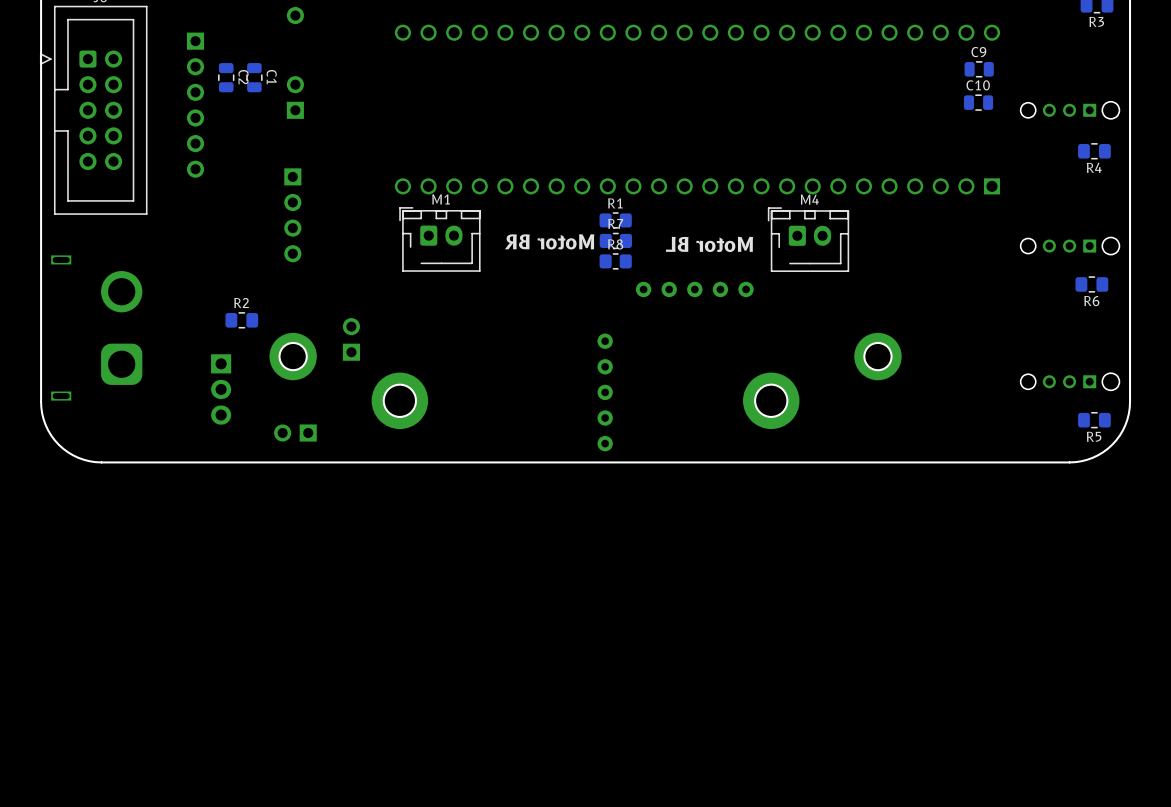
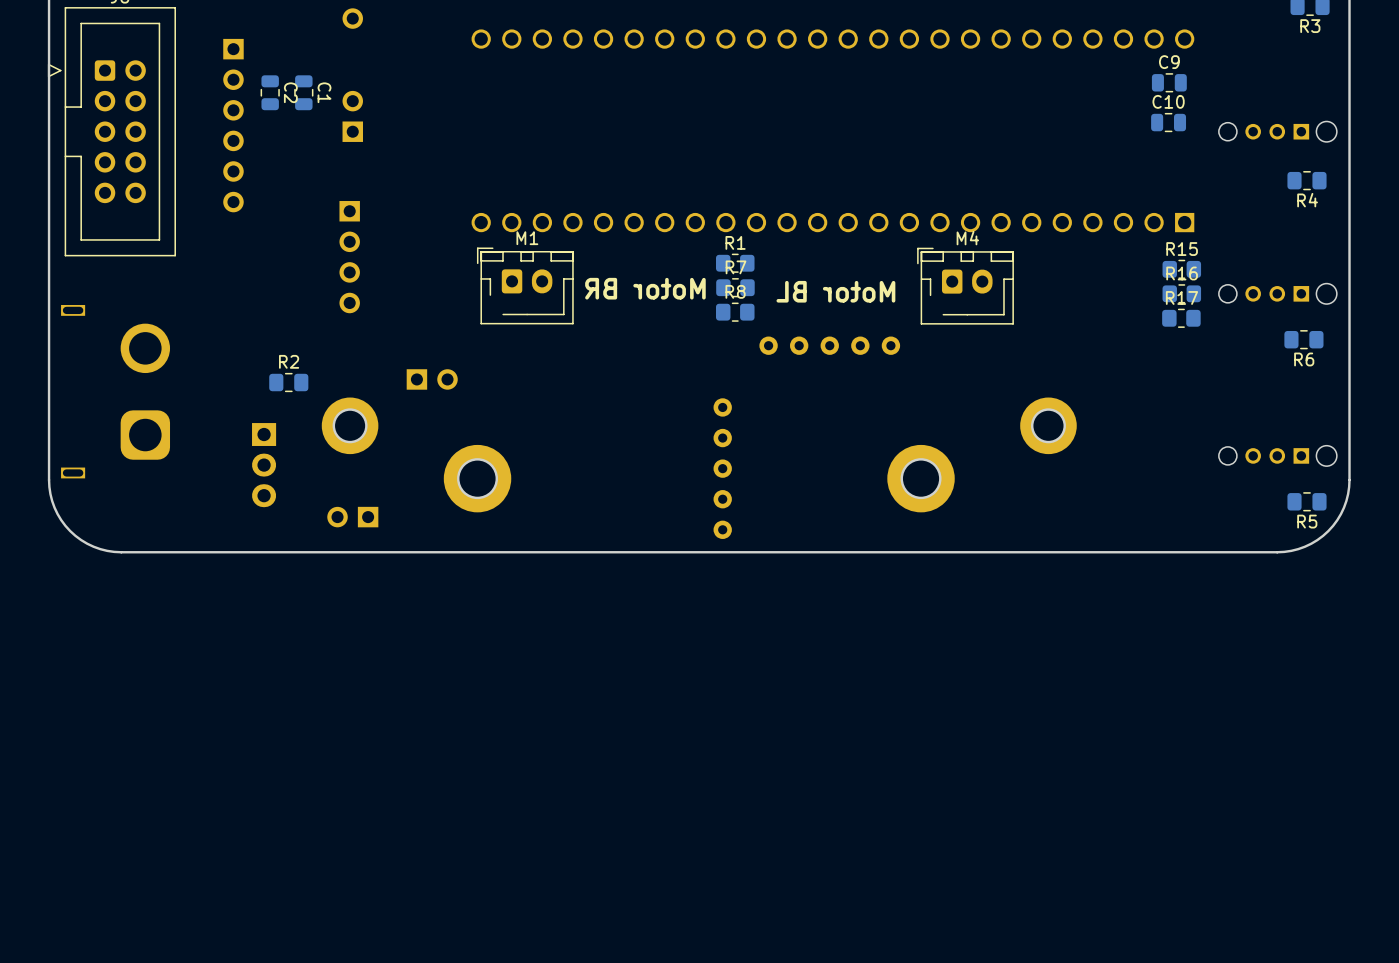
R15: none -> (1181, 269)
R16: none -> (1181, 293)
R17: none -> (1181, 318)
part rotation: 0° (351, 339) -> 90° clockwise (432, 379)

